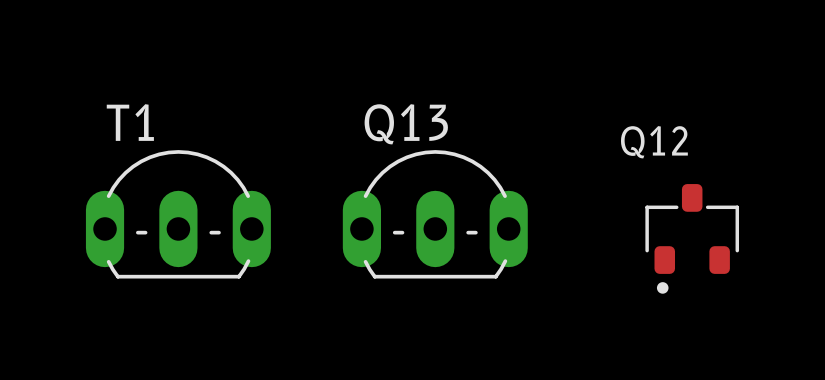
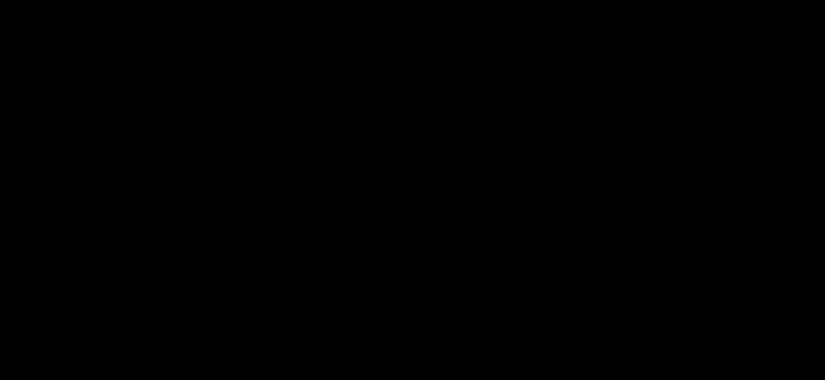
T1: (178, 214) -> none
Q13: (435, 214) -> none
Q12: (692, 238) -> none

